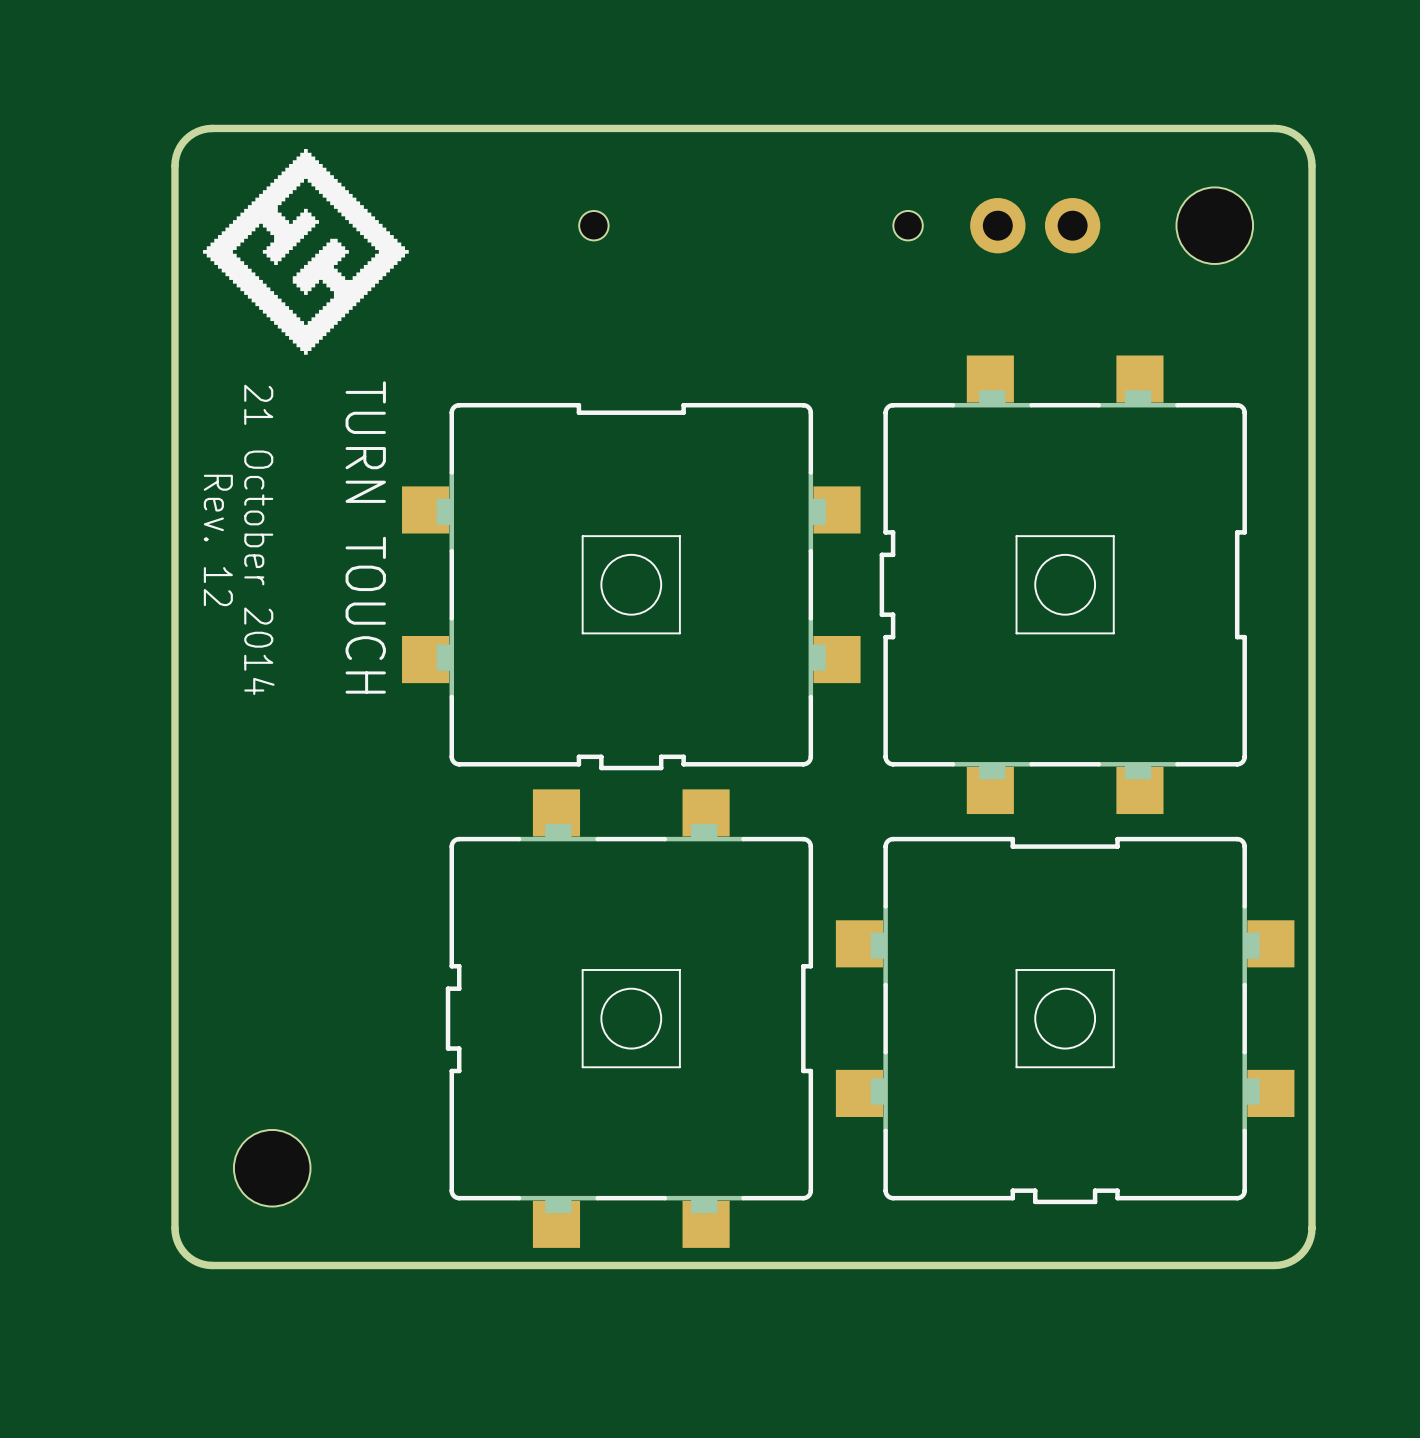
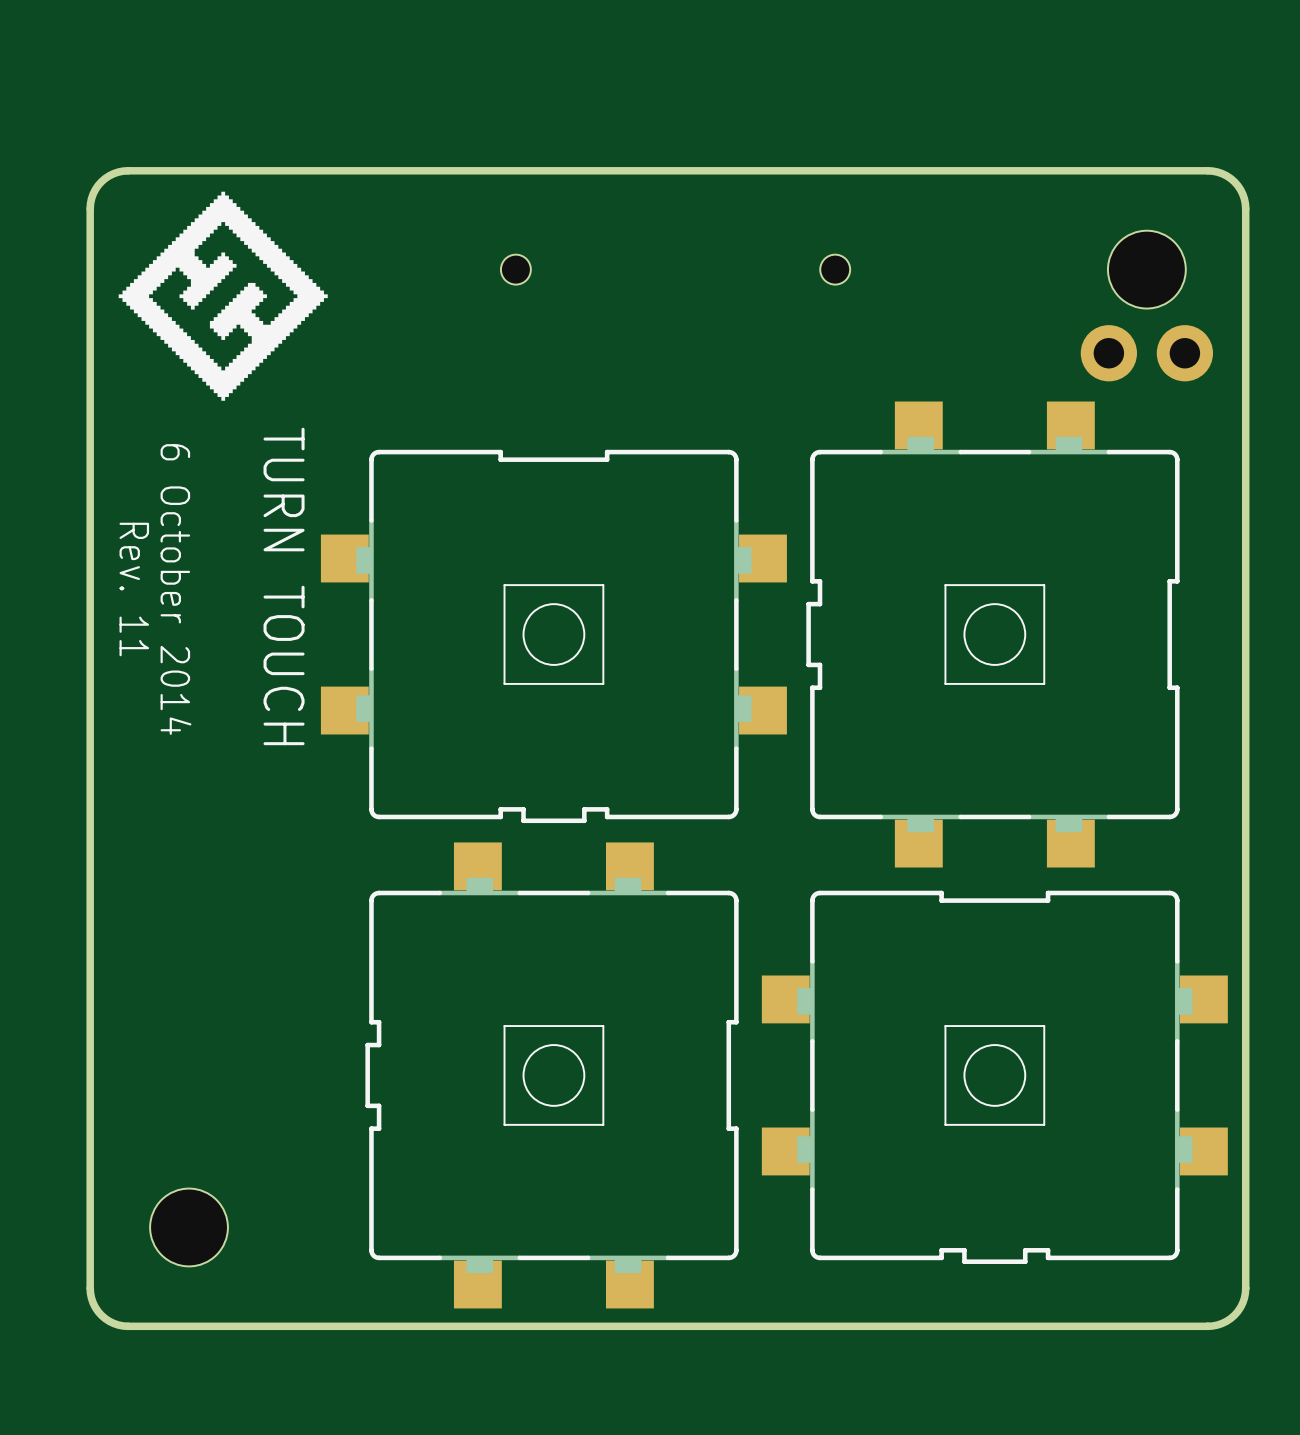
part position: (1035, 225) -> (1146, 353)
text: 21 October 2014 (259, 539) -> 6 October 2014 (175, 589)
text: Rev. 12 (218, 540) -> Rev. 11 (134, 589)

